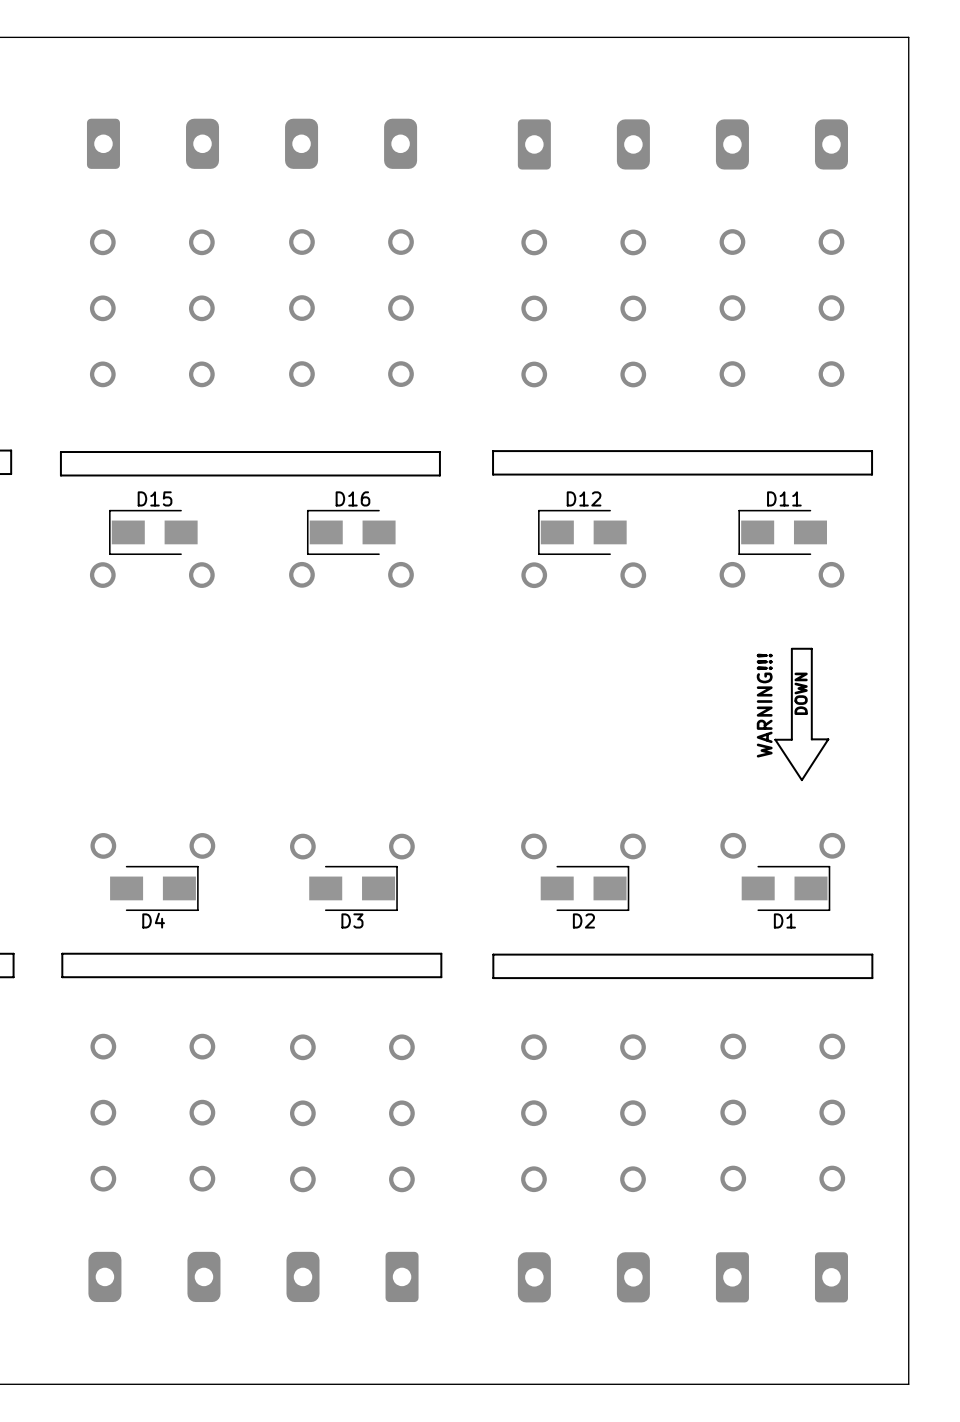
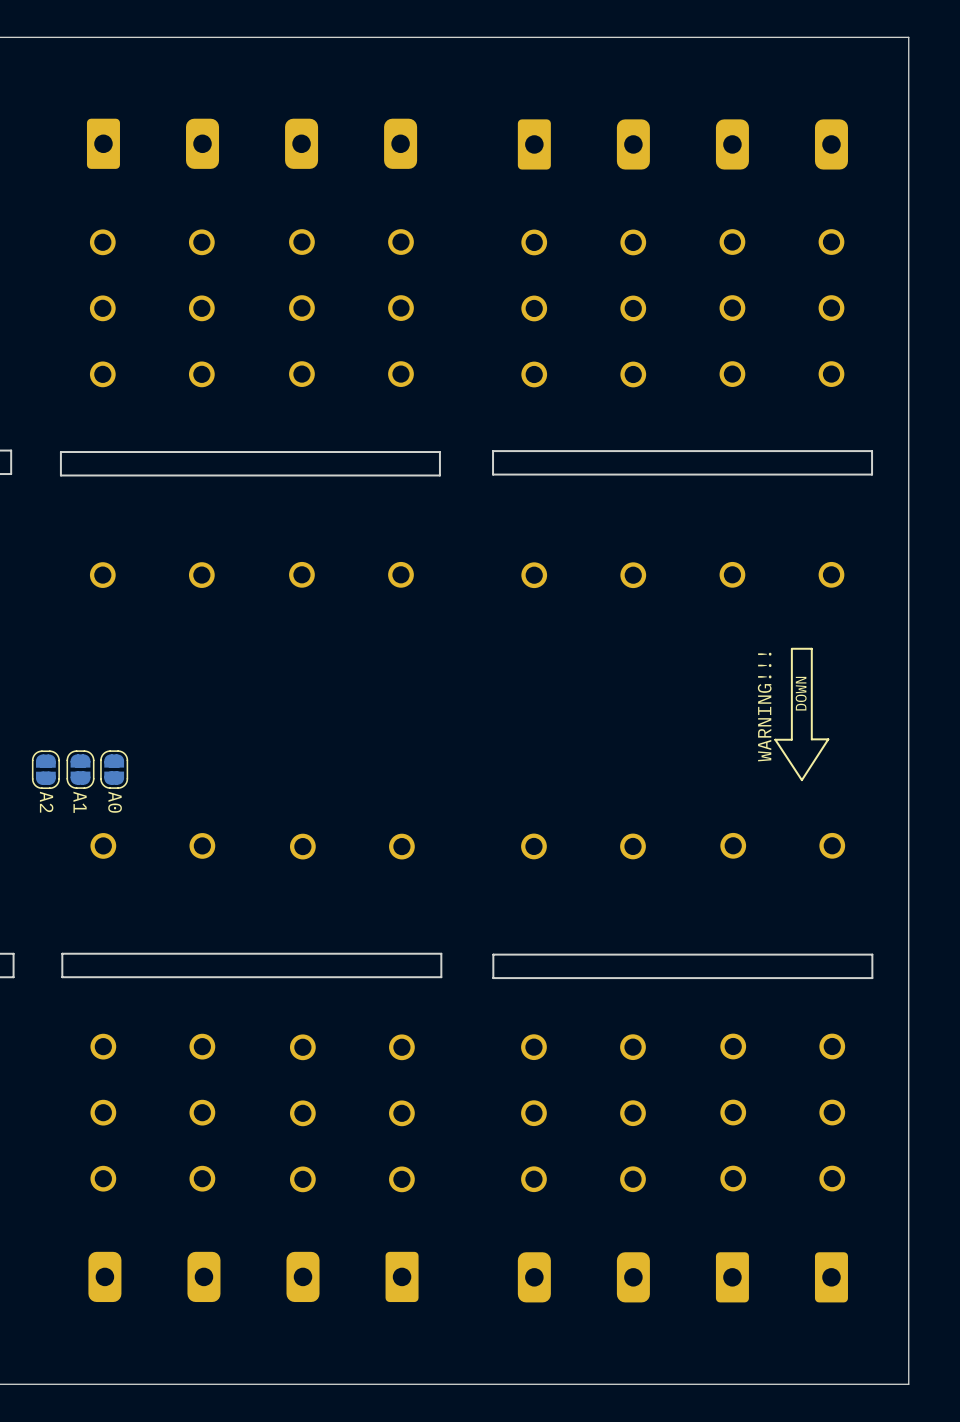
D15: (153, 532) -> none
D16: (351, 532) -> none
D12: (582, 532) -> none
D11: (782, 532) -> none
A2: none -> (45, 769)
A1: none -> (80, 769)
A0: none -> (114, 769)
D4: (154, 888) -> none
D3: (353, 888) -> none
D2: (585, 888) -> none
D1: (785, 888) -> none

